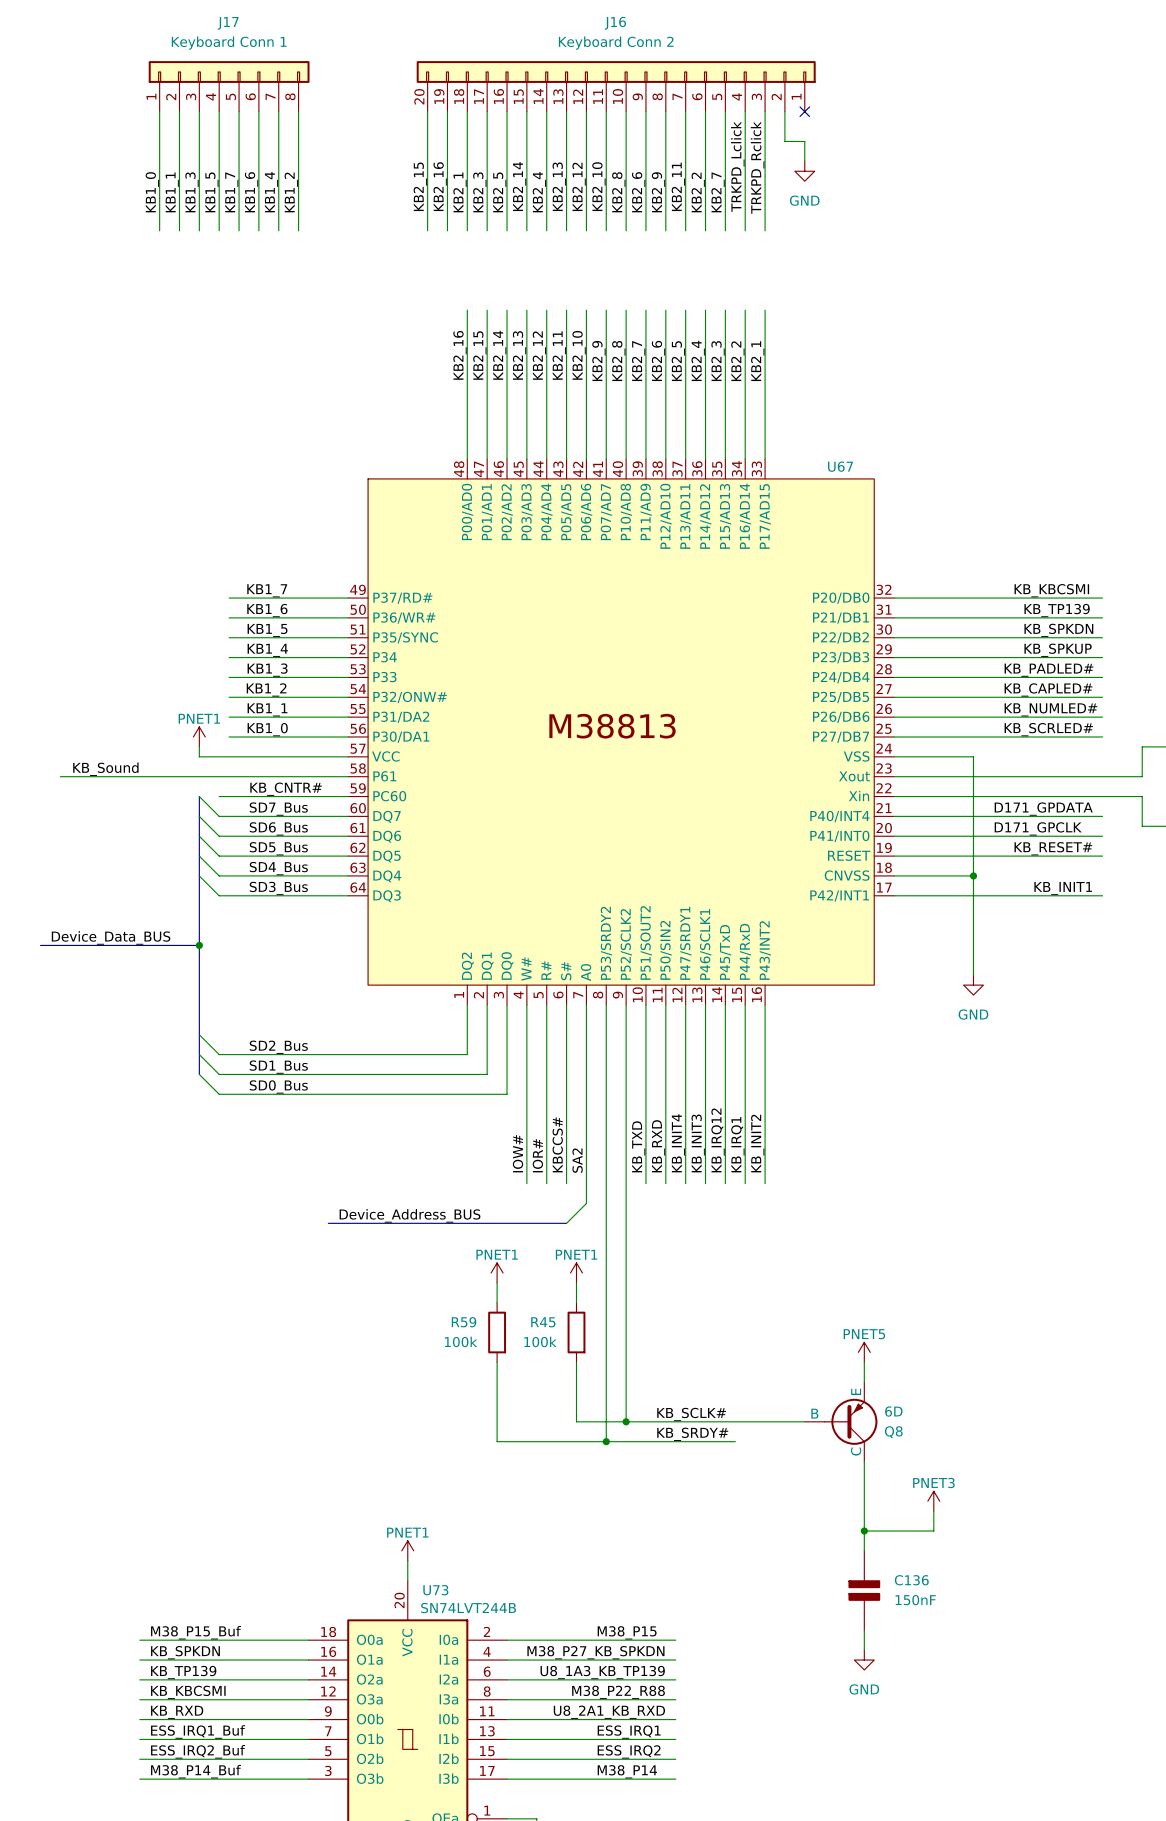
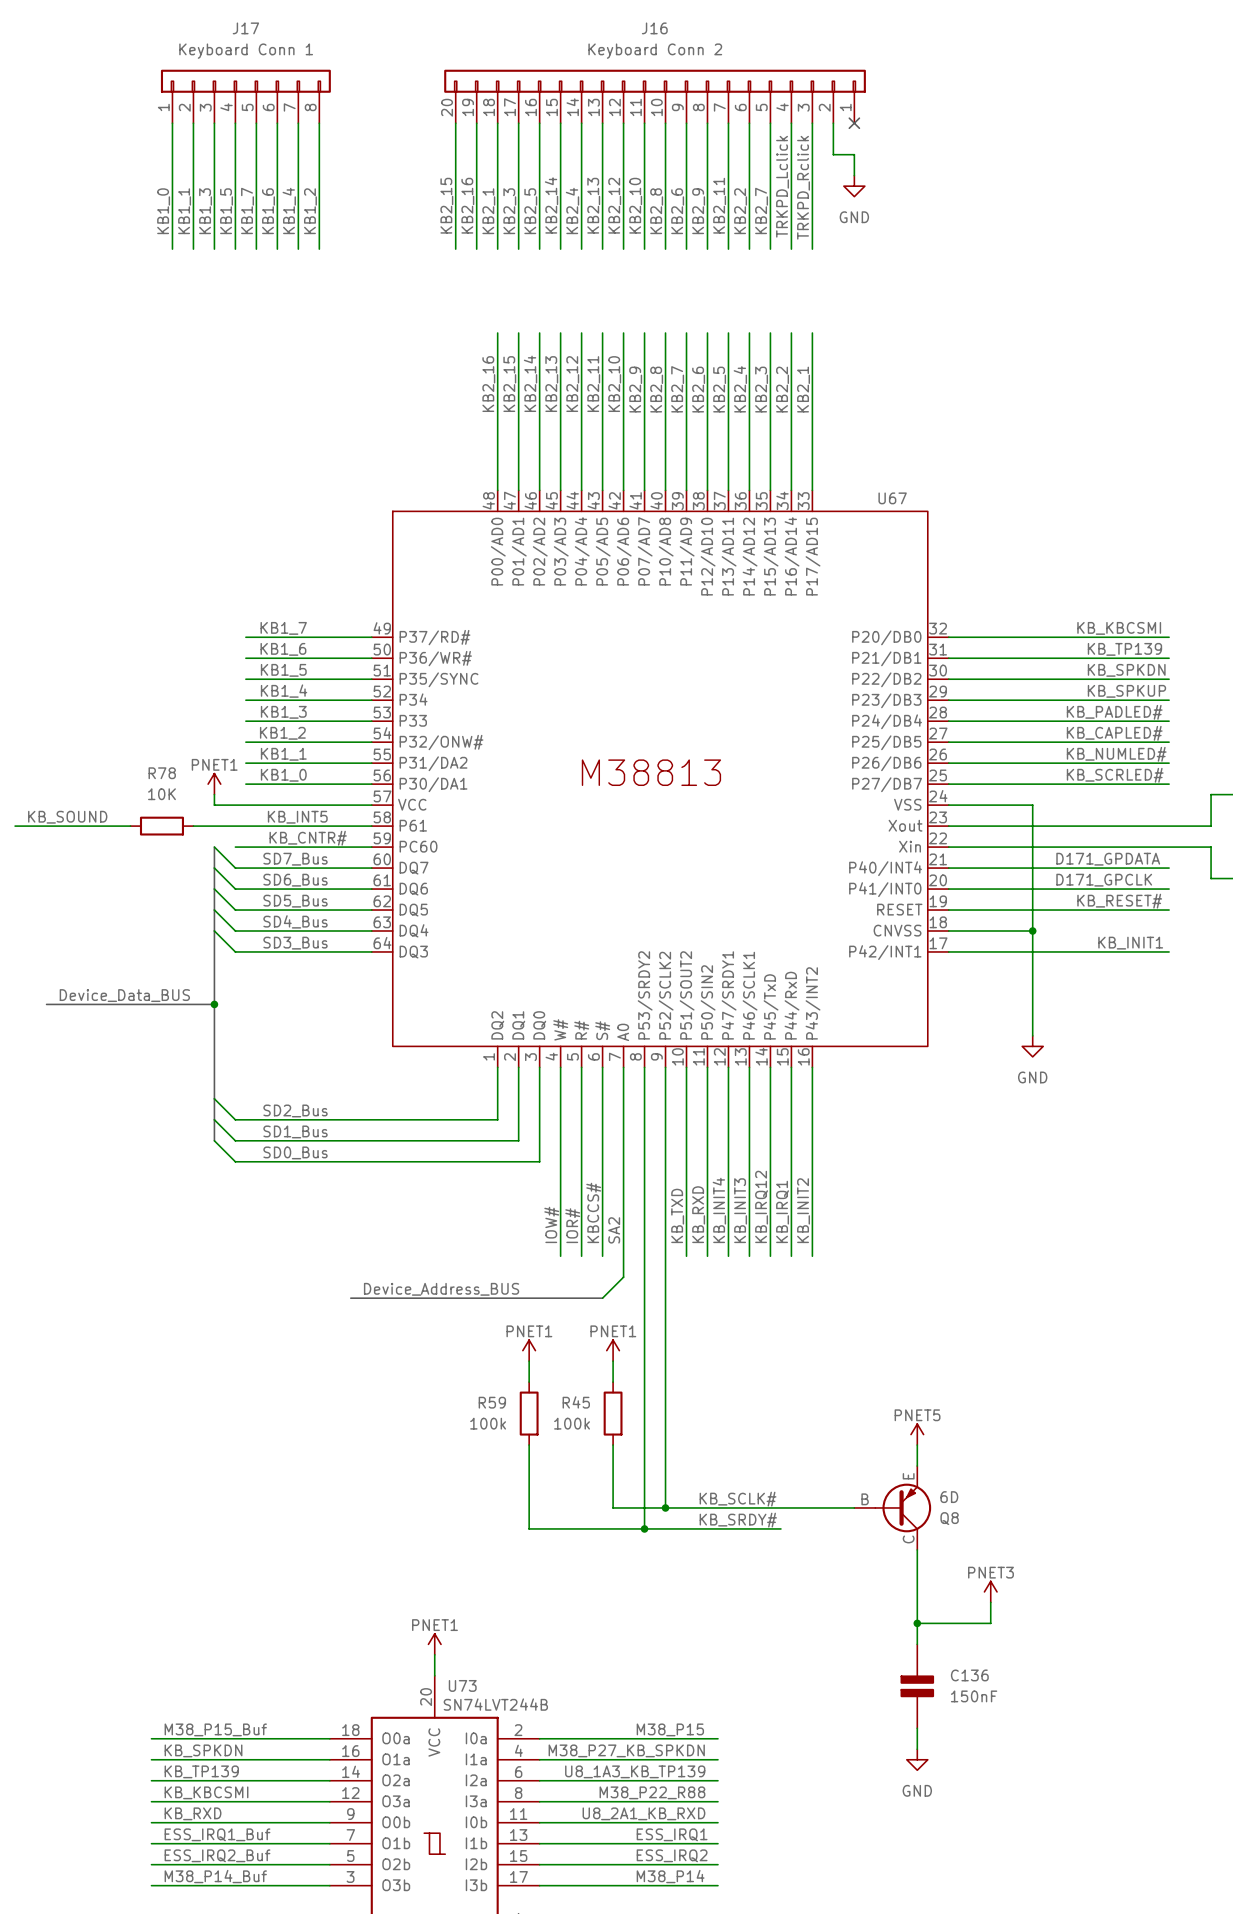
label: none -> KB_SOUND (67, 817)
label: KB_Sound (105, 769) -> none
label: none -> KB_INT5 (297, 817)
wire: none -> (15, 826) (67, 826)
wire: (119, 776) (179, 776) -> none
R78: none -> 10K (161, 826)

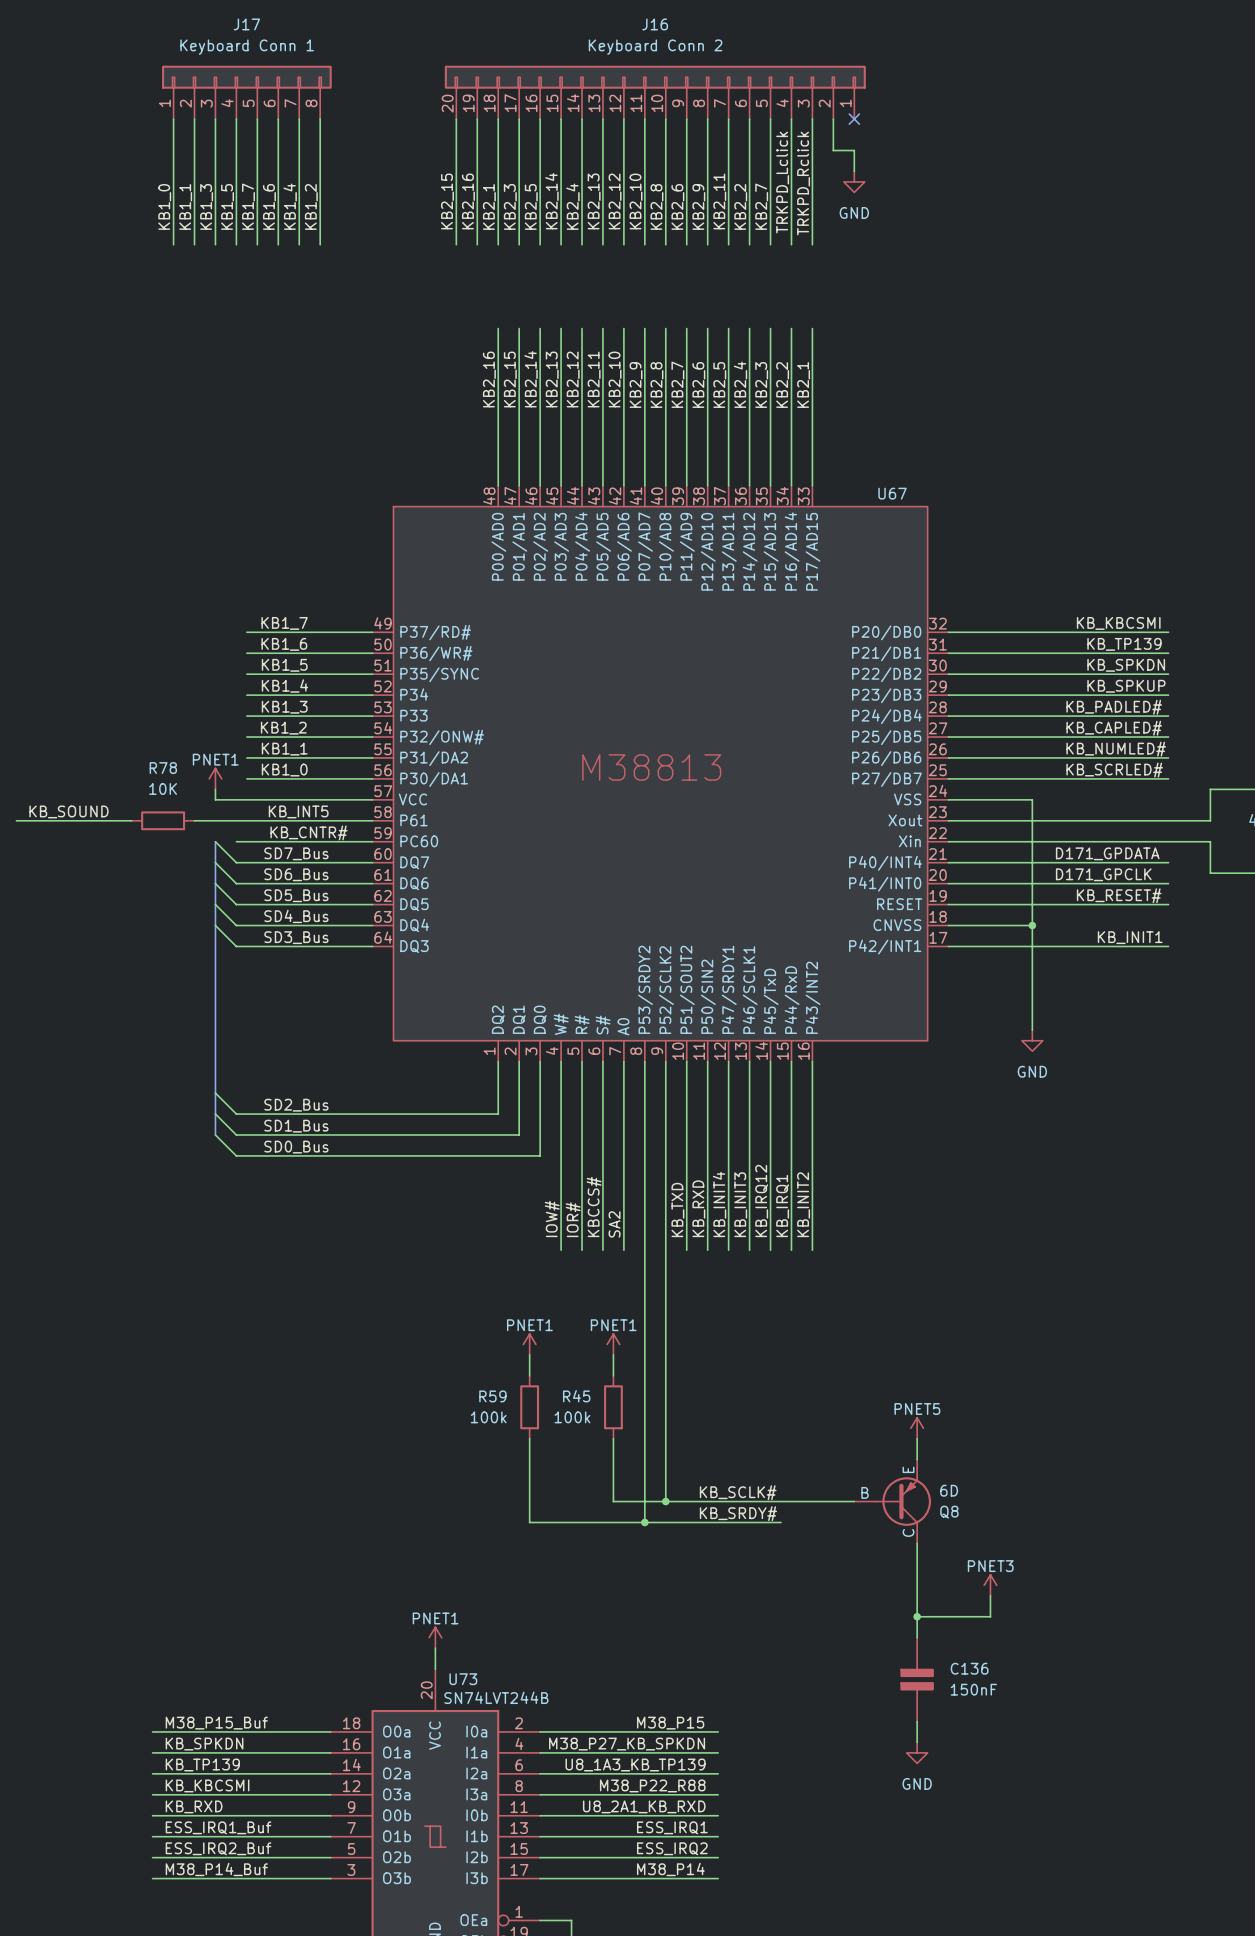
label: Device_Data_BUS (124, 995) -> none
bus: (46, 1004) (214, 1004) -> none
junction: (214, 1004) -> none
wire: (623, 1256) (623, 1277) (602, 1298) -> none
label: Device_Address_BUS (441, 1289) -> none
bus: (350, 1298) (602, 1298) -> none

